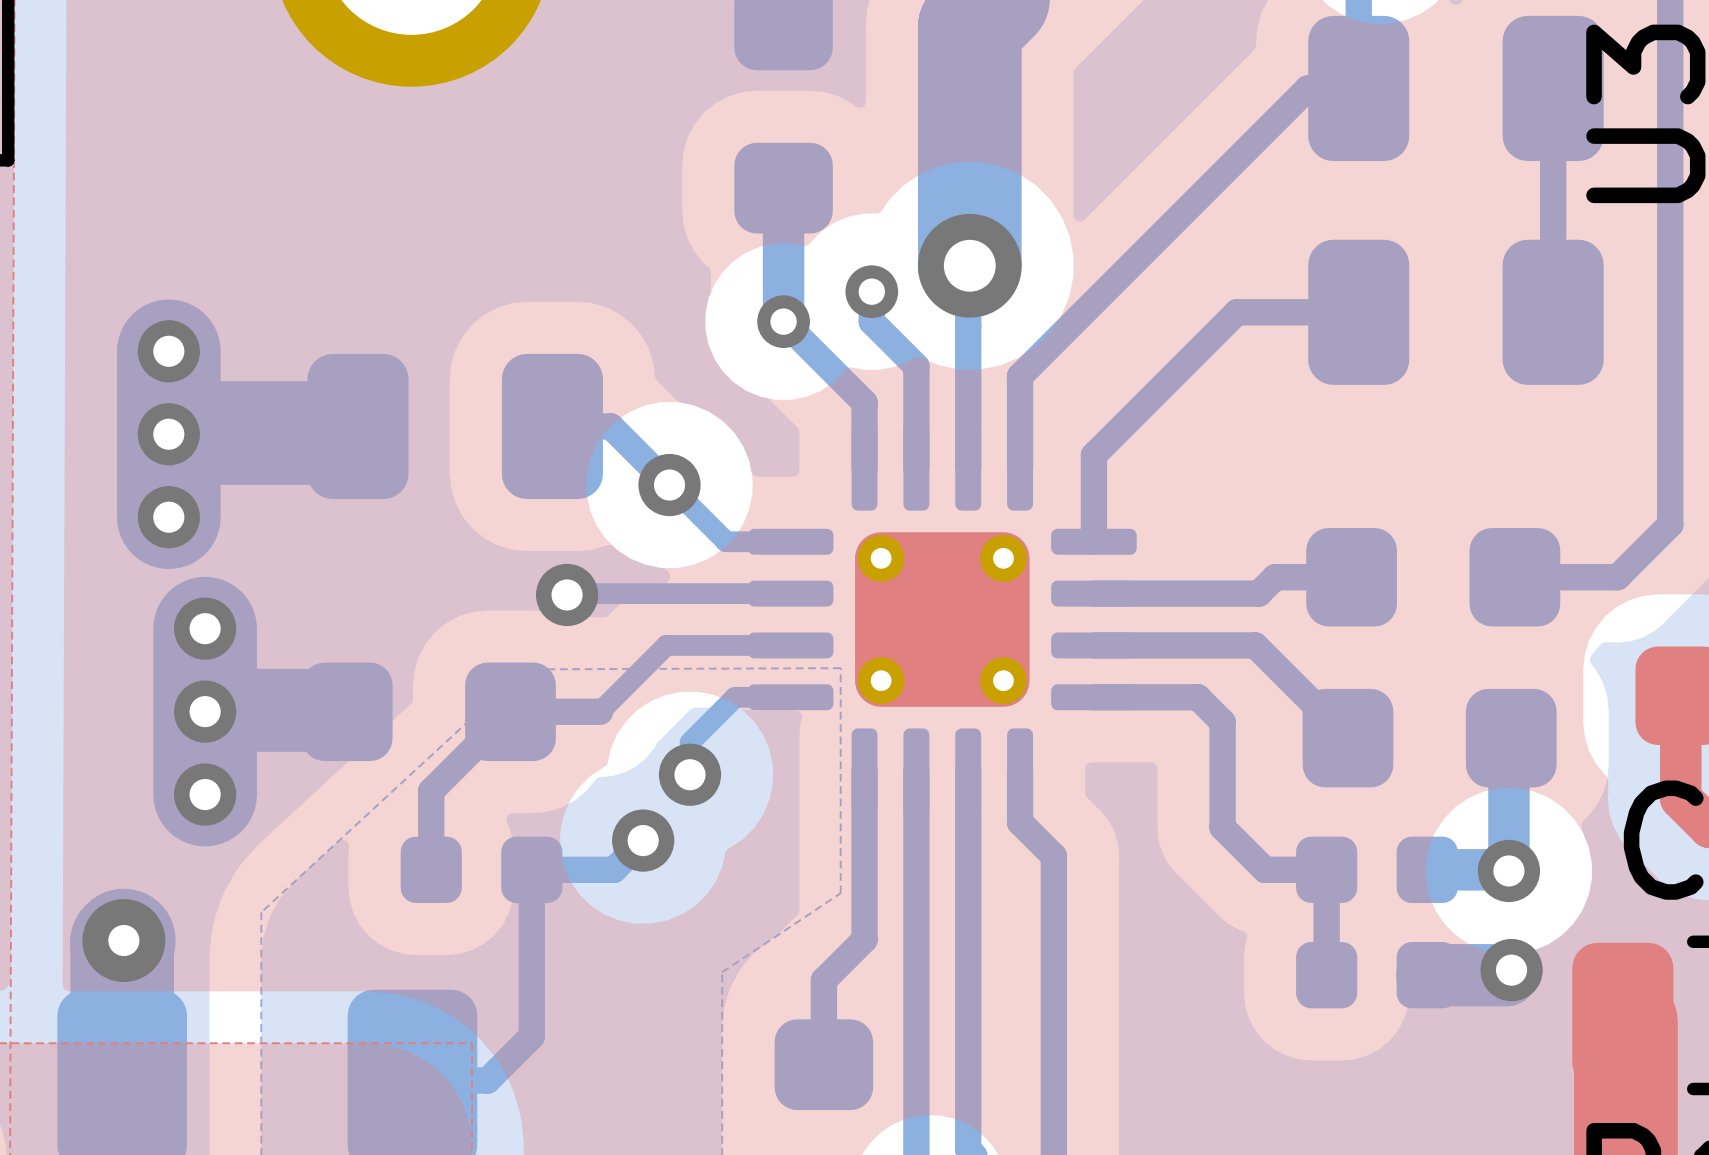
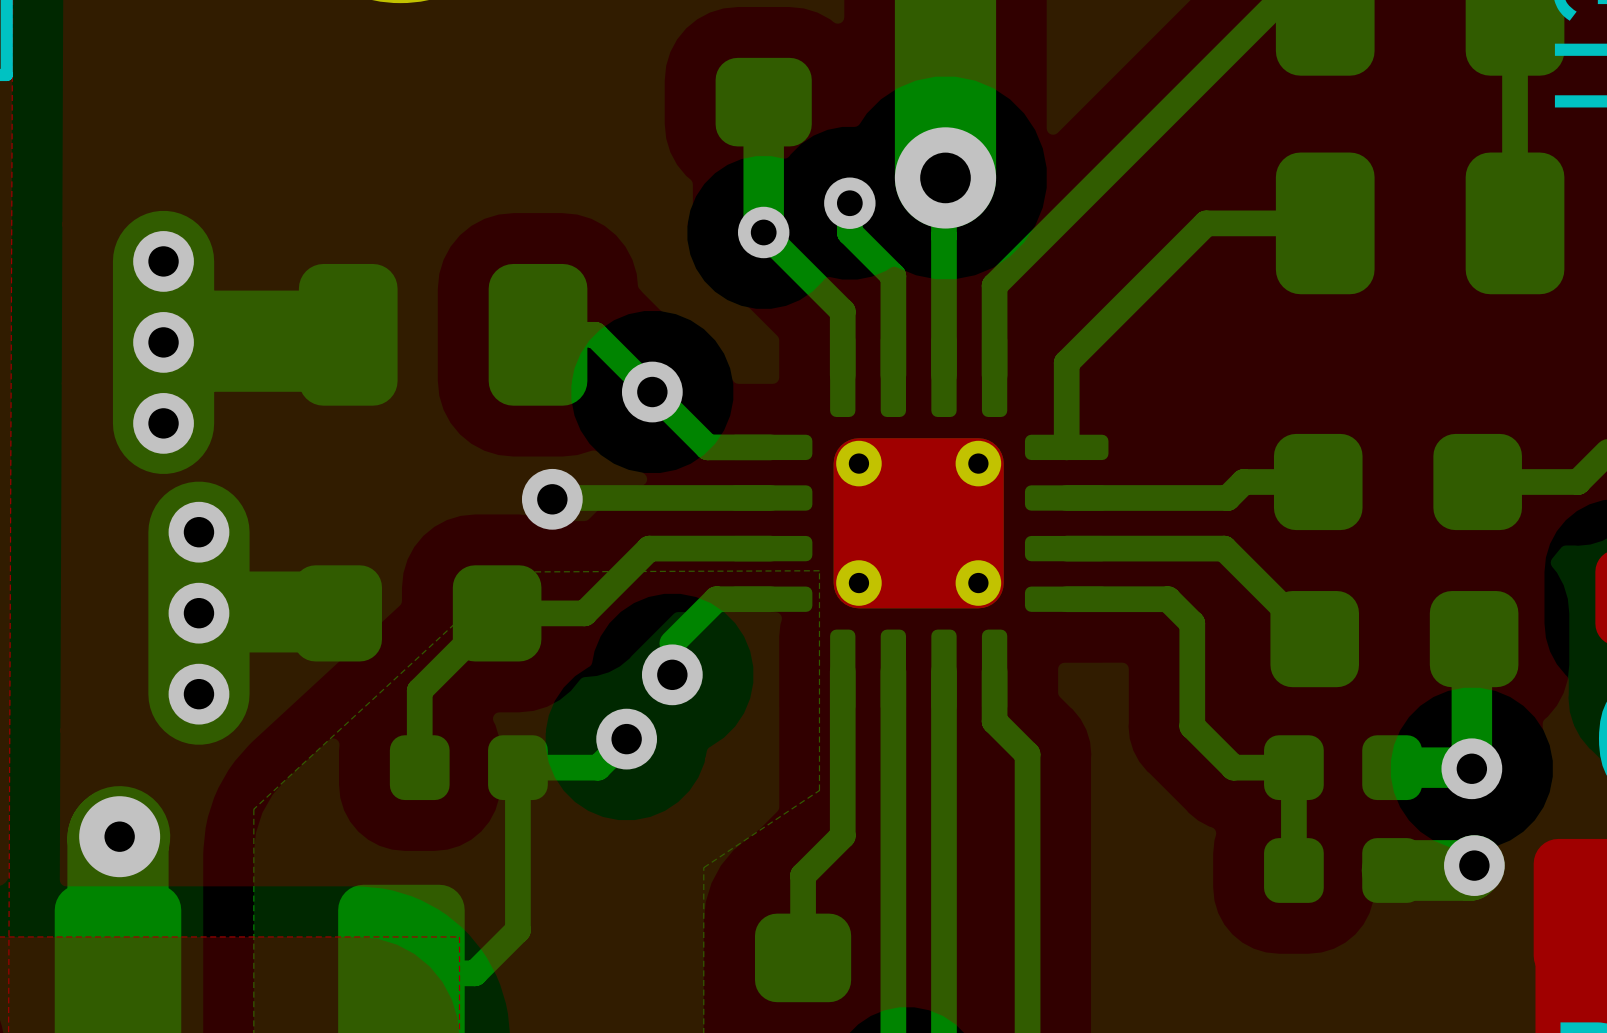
bottom track width: thin (669, 485) (726, 541) (790, 541) -> thick (652, 392) (707, 447) (770, 447)
bottom track width: thin (568, 593) (790, 593) -> thick (553, 497) (770, 497)
bottom track width: thin (790, 645) (666, 645) (600, 711) -> thick (770, 548) (649, 548) (584, 613)
bottom track width: thin (790, 697) (735, 697) (689, 742) -> thick (770, 599) (716, 599) (672, 643)

